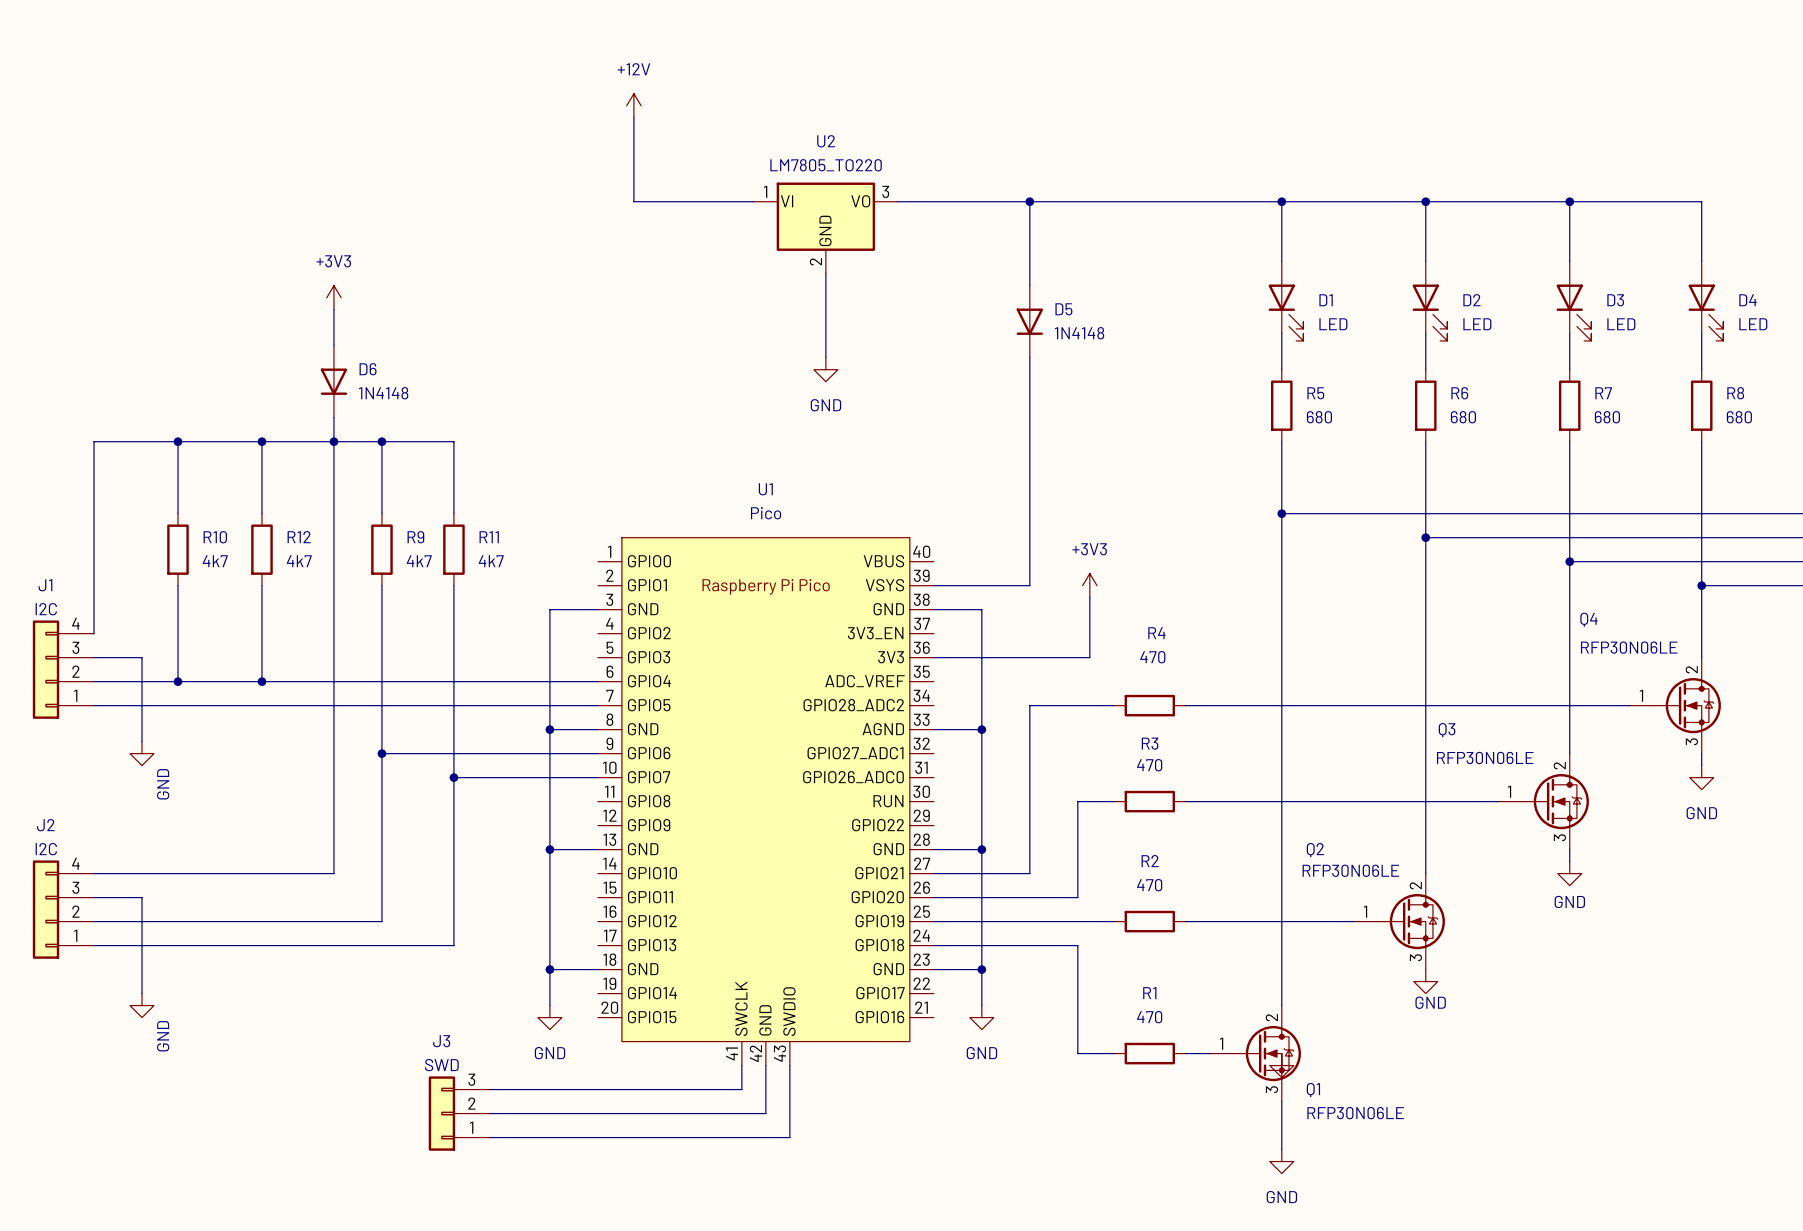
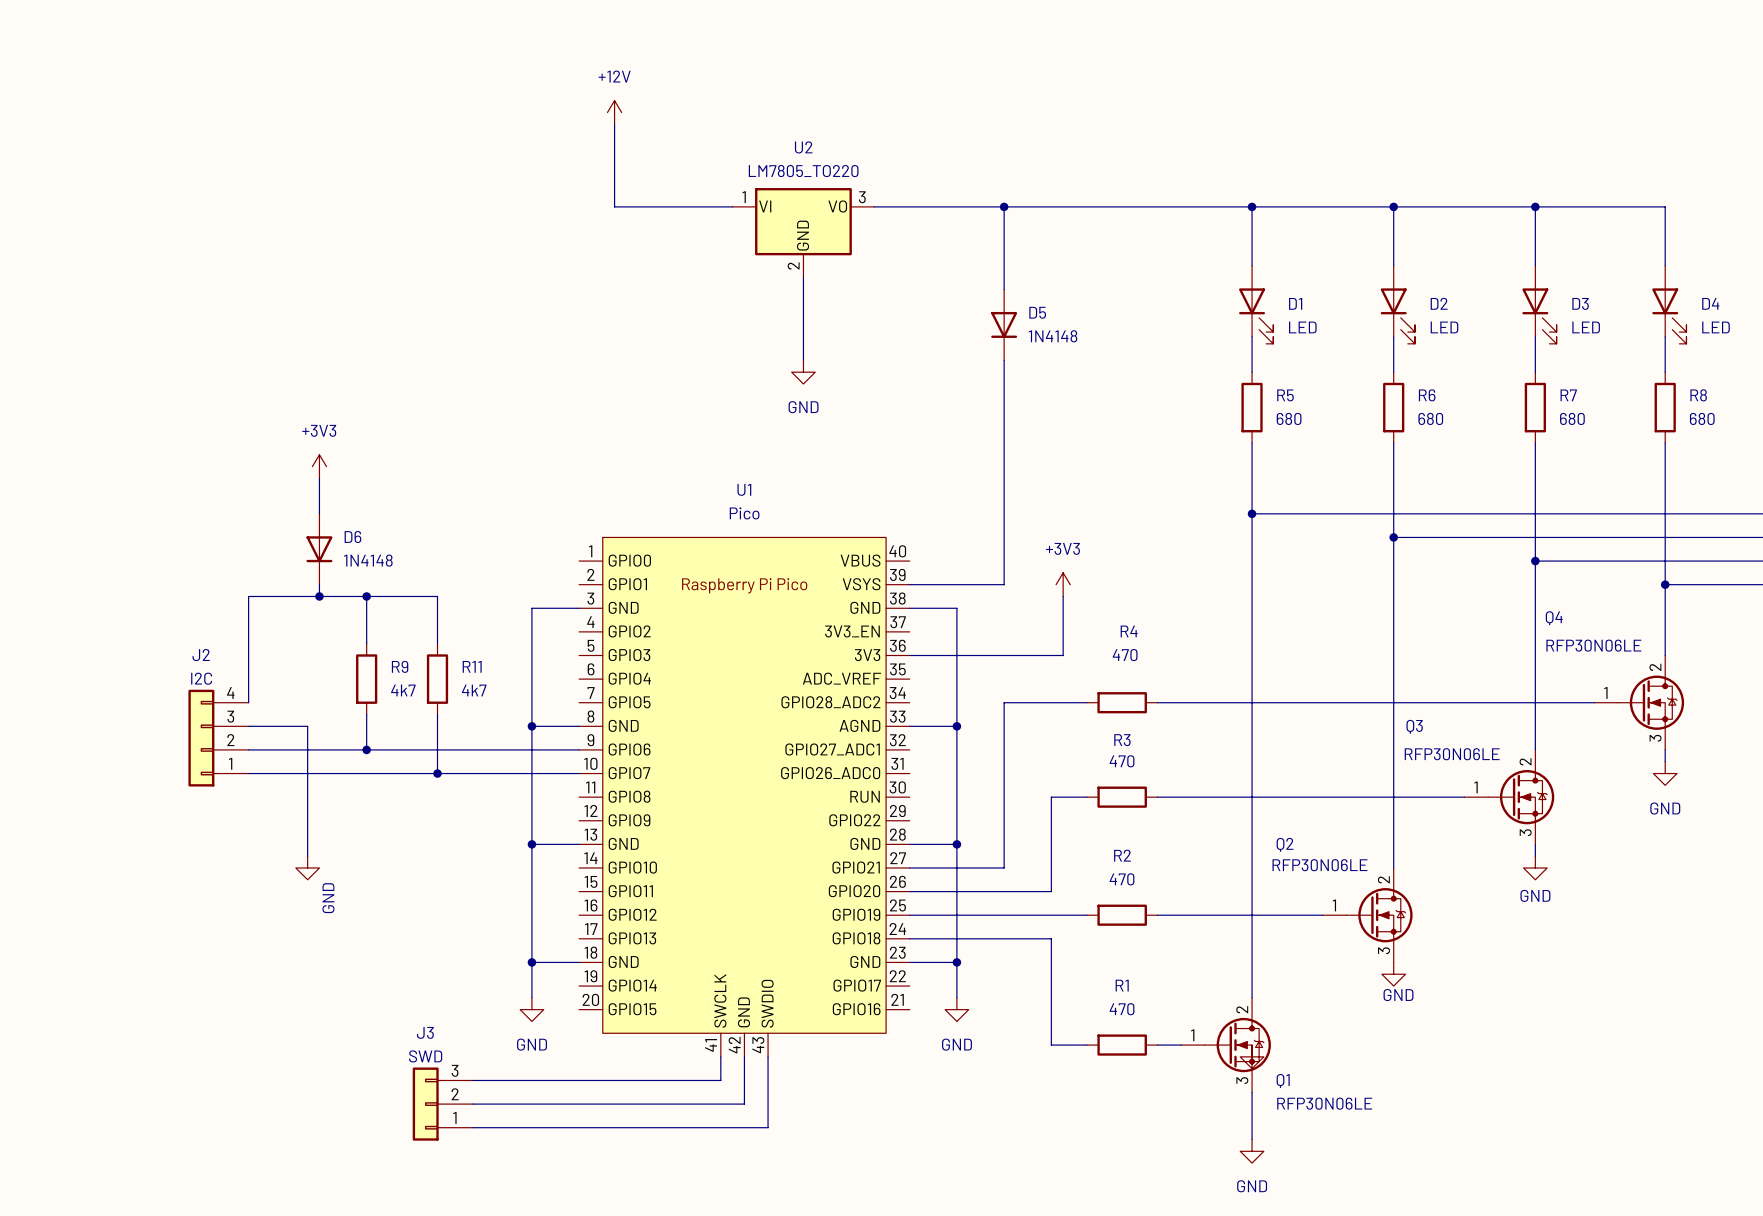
power symbol position: +3V3 (333, 297) -> +3V3 (319, 466)
wire: (333, 309) (333, 345) -> none
D6 position: (333, 381) -> (319, 549)
wire: (333, 417) (333, 477) -> none
wire: (177, 441) (177, 513) -> none
junction: (177, 441) -> none
wire: (261, 441) (261, 513) -> none
junction: (261, 441) -> none
junction: (333, 441) -> none
wire: (381, 441) (381, 513) -> none
junction: (381, 441) -> none
wire: (453, 513) (453, 441) (94, 441) (94, 633) -> none
R10: 4k7 (177, 549) -> none
R12: 4k7 (261, 549) -> none
R9 position: (381, 549) -> (366, 679)
R11 position: (453, 549) -> (437, 679)
wire: (177, 585) (177, 681) -> none
wire: (261, 585) (261, 597) -> (437, 596) (248, 596)
wire: (381, 585) (381, 597) -> none
wire: (453, 585) (453, 597) -> none
wire: (333, 597) (333, 873) (94, 873) -> none
junction: none -> (319, 596)
junction: none -> (366, 596)
wire: (381, 645) (381, 717) -> none
wire: (453, 645) (453, 717) -> none
wire: (94, 657) (142, 657) (142, 741) -> none
J1: I2C (63, 669) -> none
wire: (94, 681) (597, 681) -> none
junction: (177, 681) -> none
wire: none -> (248, 679) (248, 702)
junction: (261, 681) -> none
wire: (94, 705) (597, 705) -> none
wire: none -> (248, 726) (307, 726) (307, 856)
power symbol: GND (142, 753) -> none
wire: (381, 753) (381, 921) (94, 921) -> (366, 749) (248, 749)
wire: (453, 777) (453, 945) (94, 945) -> (437, 773) (248, 773)
power symbol: none -> GND (307, 867)
wire: (94, 897) (142, 897) (142, 993) -> none
J2 position: (63, 909) -> (218, 738)
power symbol: GND (142, 1005) -> none

